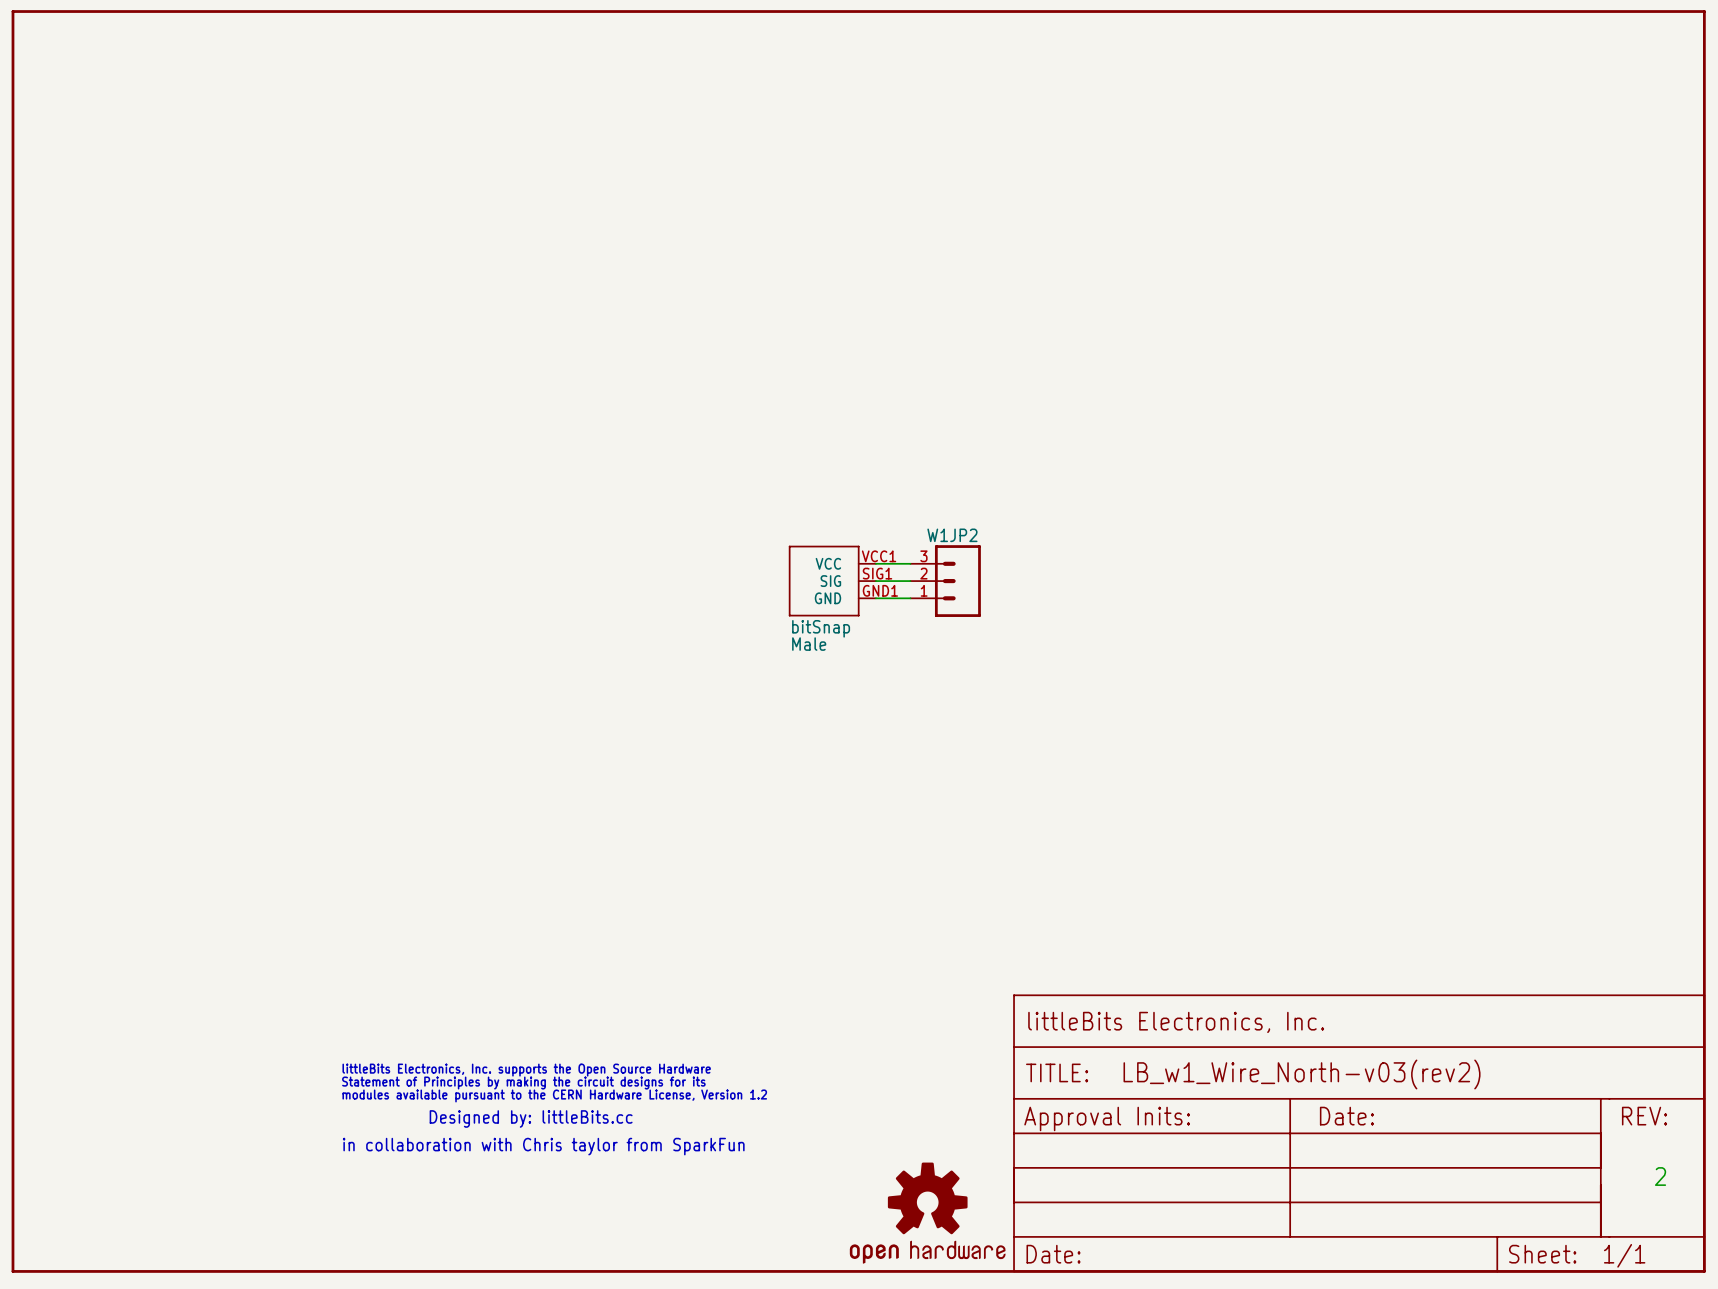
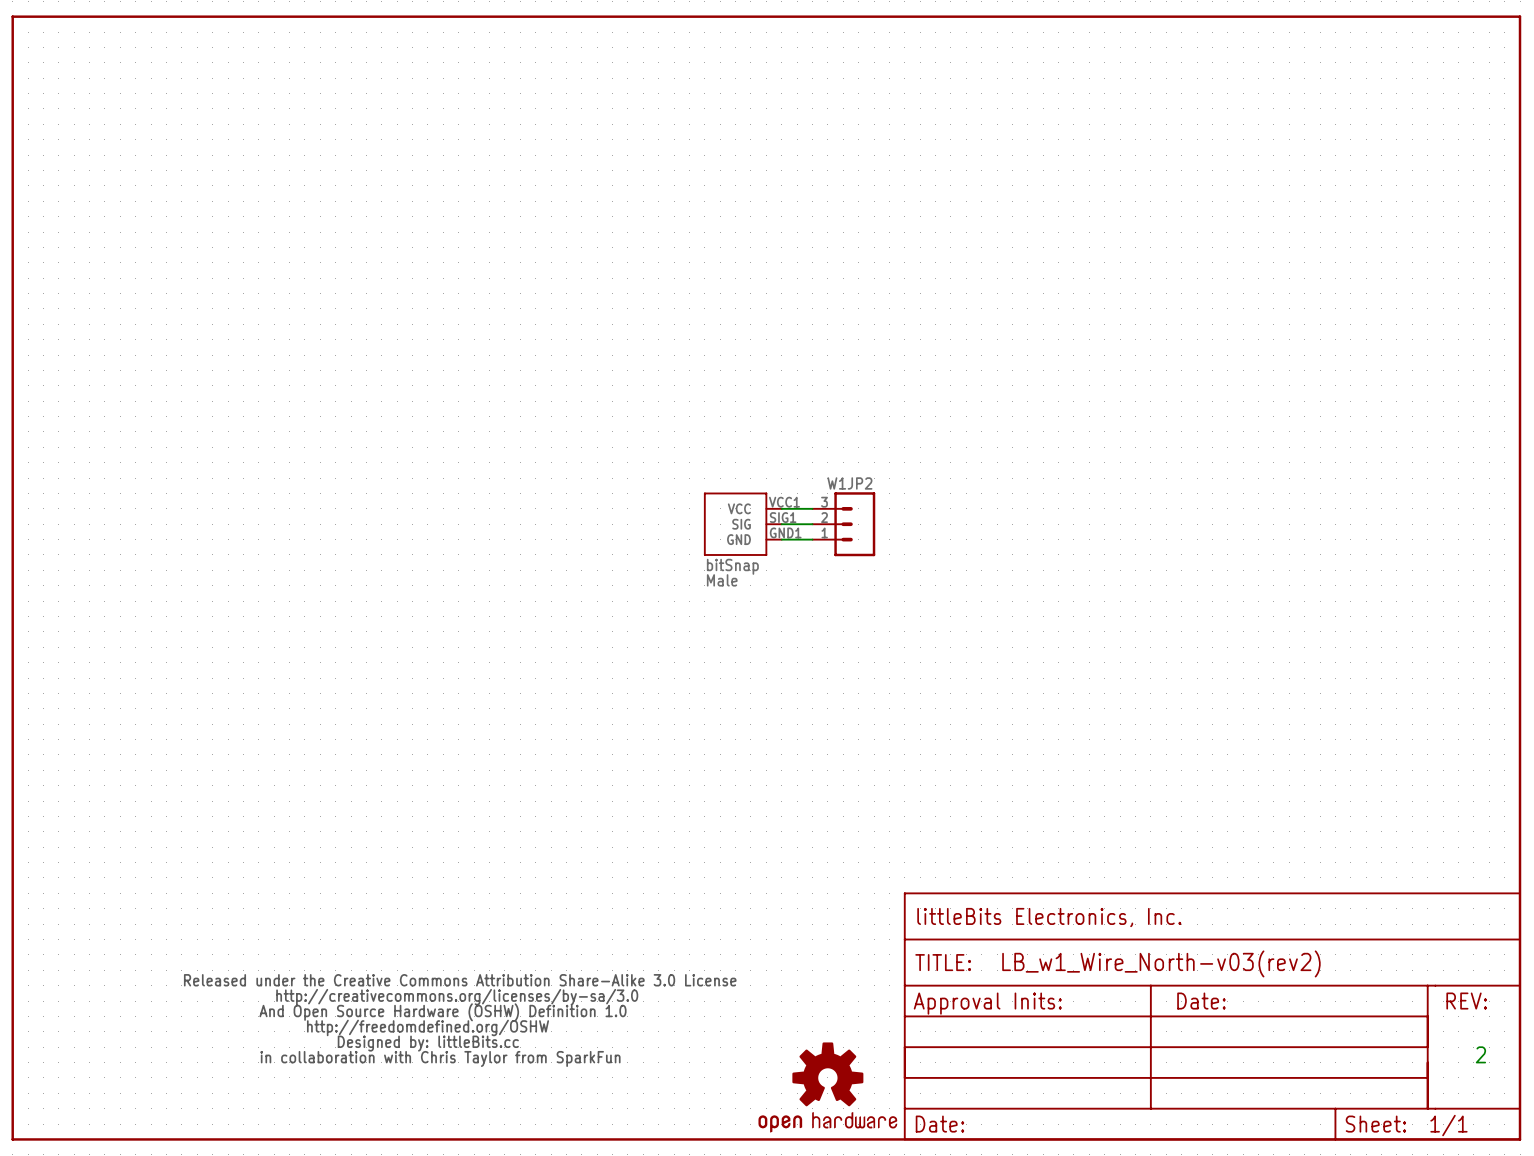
part: (554, 1095) -> none
part: none -> (460, 1020)
text: in collaboration with Chris taylor from SparkFun (543, 1146) -> none

